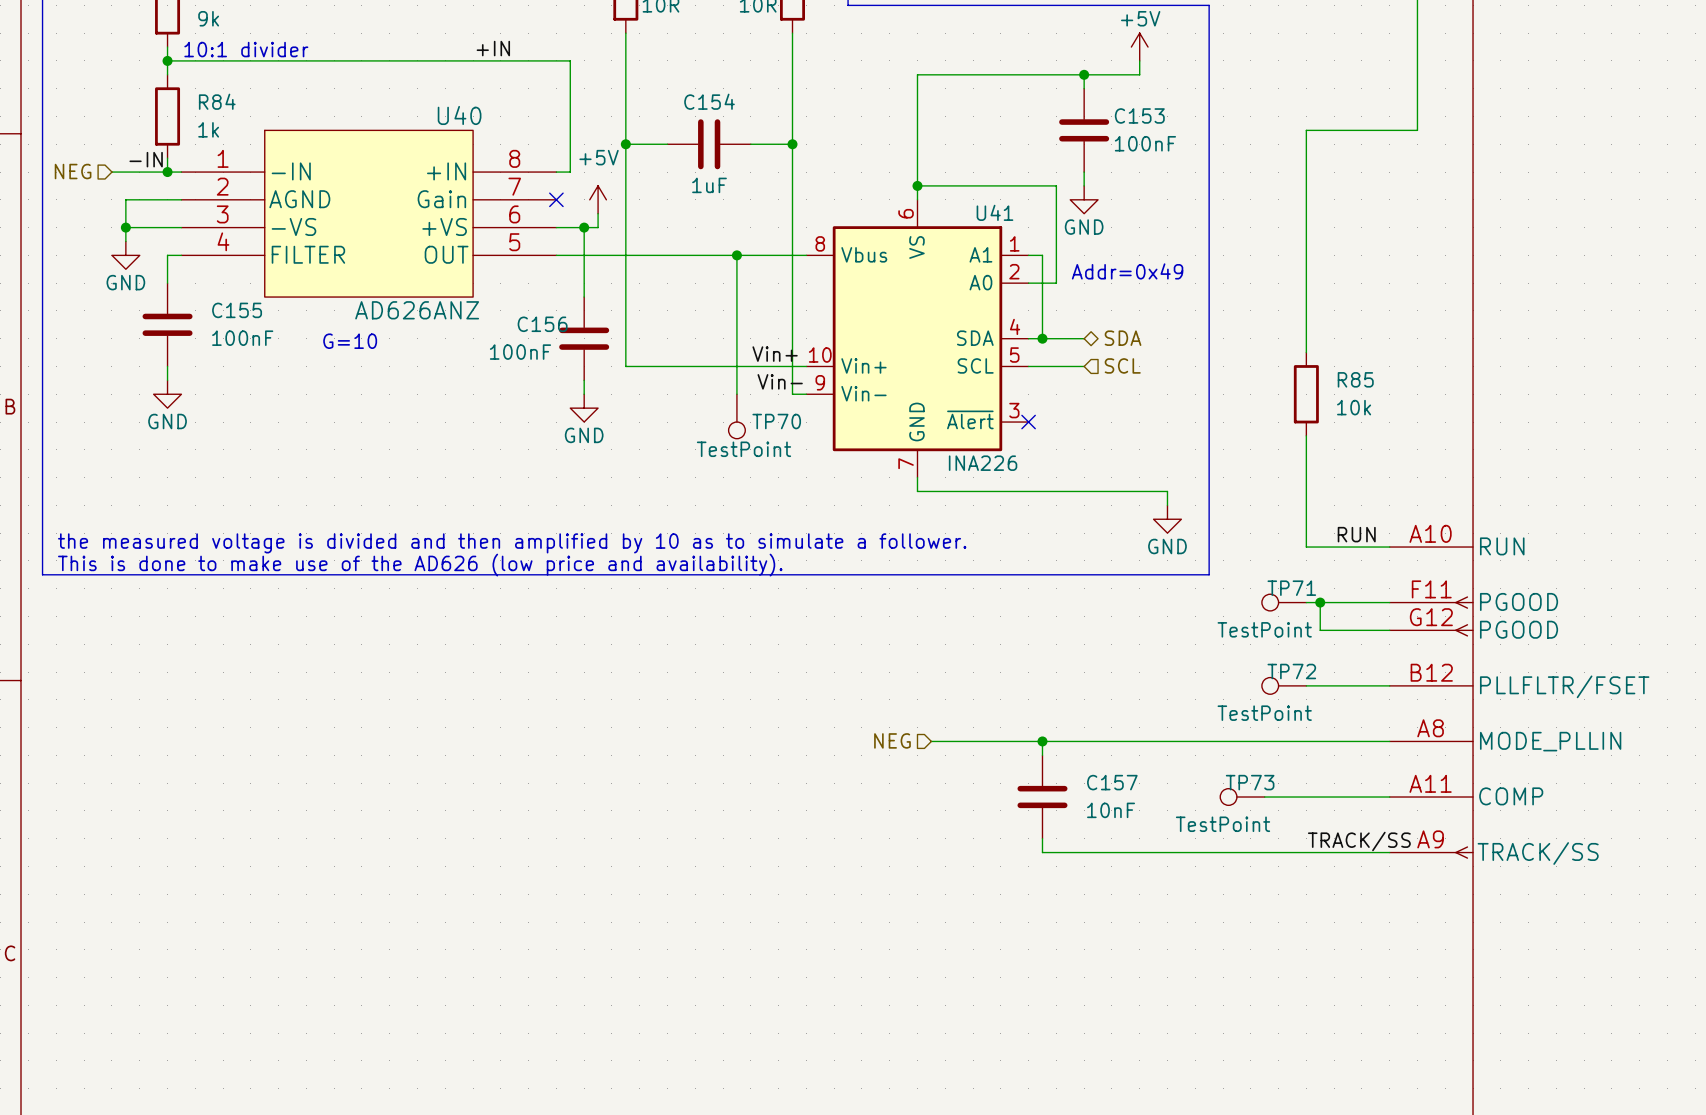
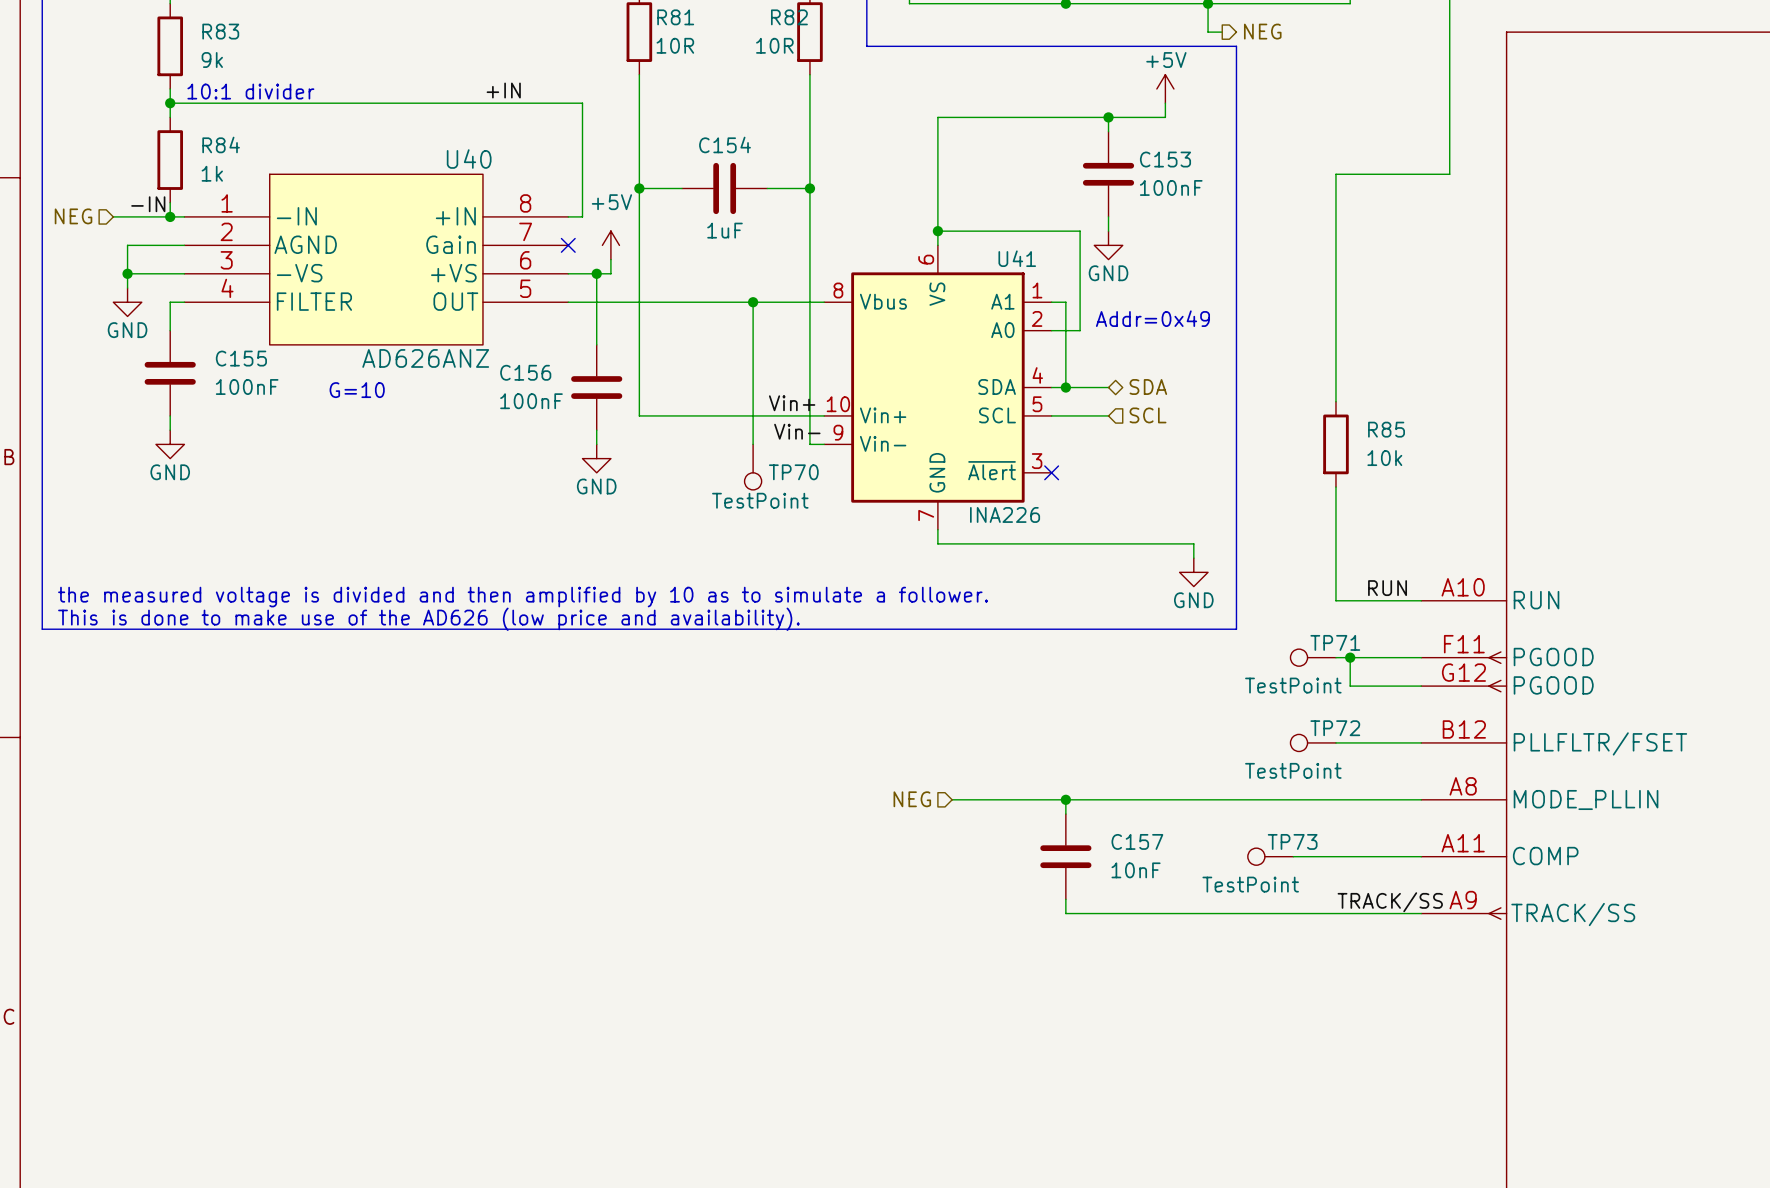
C156 name position: C156 (542, 324) -> C156 (525, 372)
TP71 name position: TP71 (1291, 588) -> TP71 (1335, 642)
TP72 name position: TP72 (1291, 671) -> TP72 (1335, 728)
TP73 name position: TP73 (1250, 782) -> TP73 (1292, 841)

